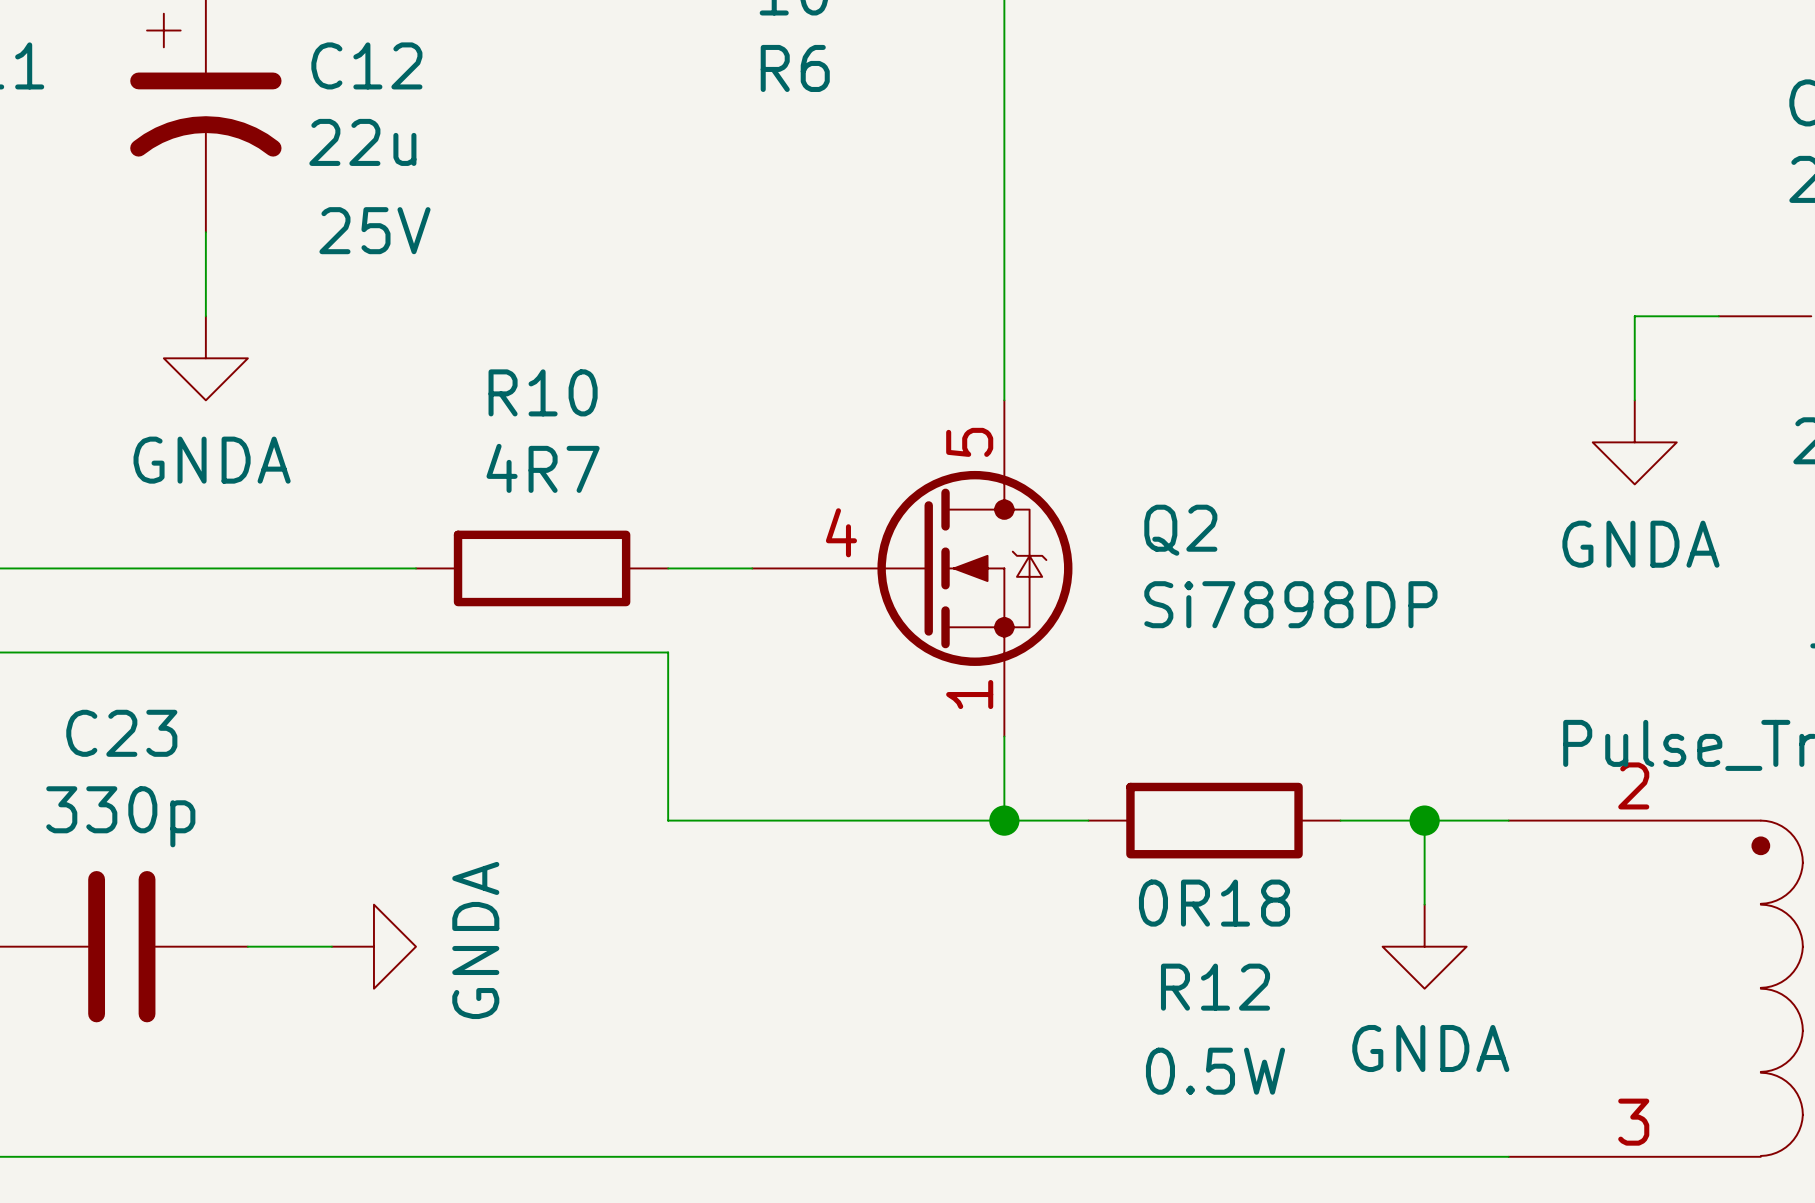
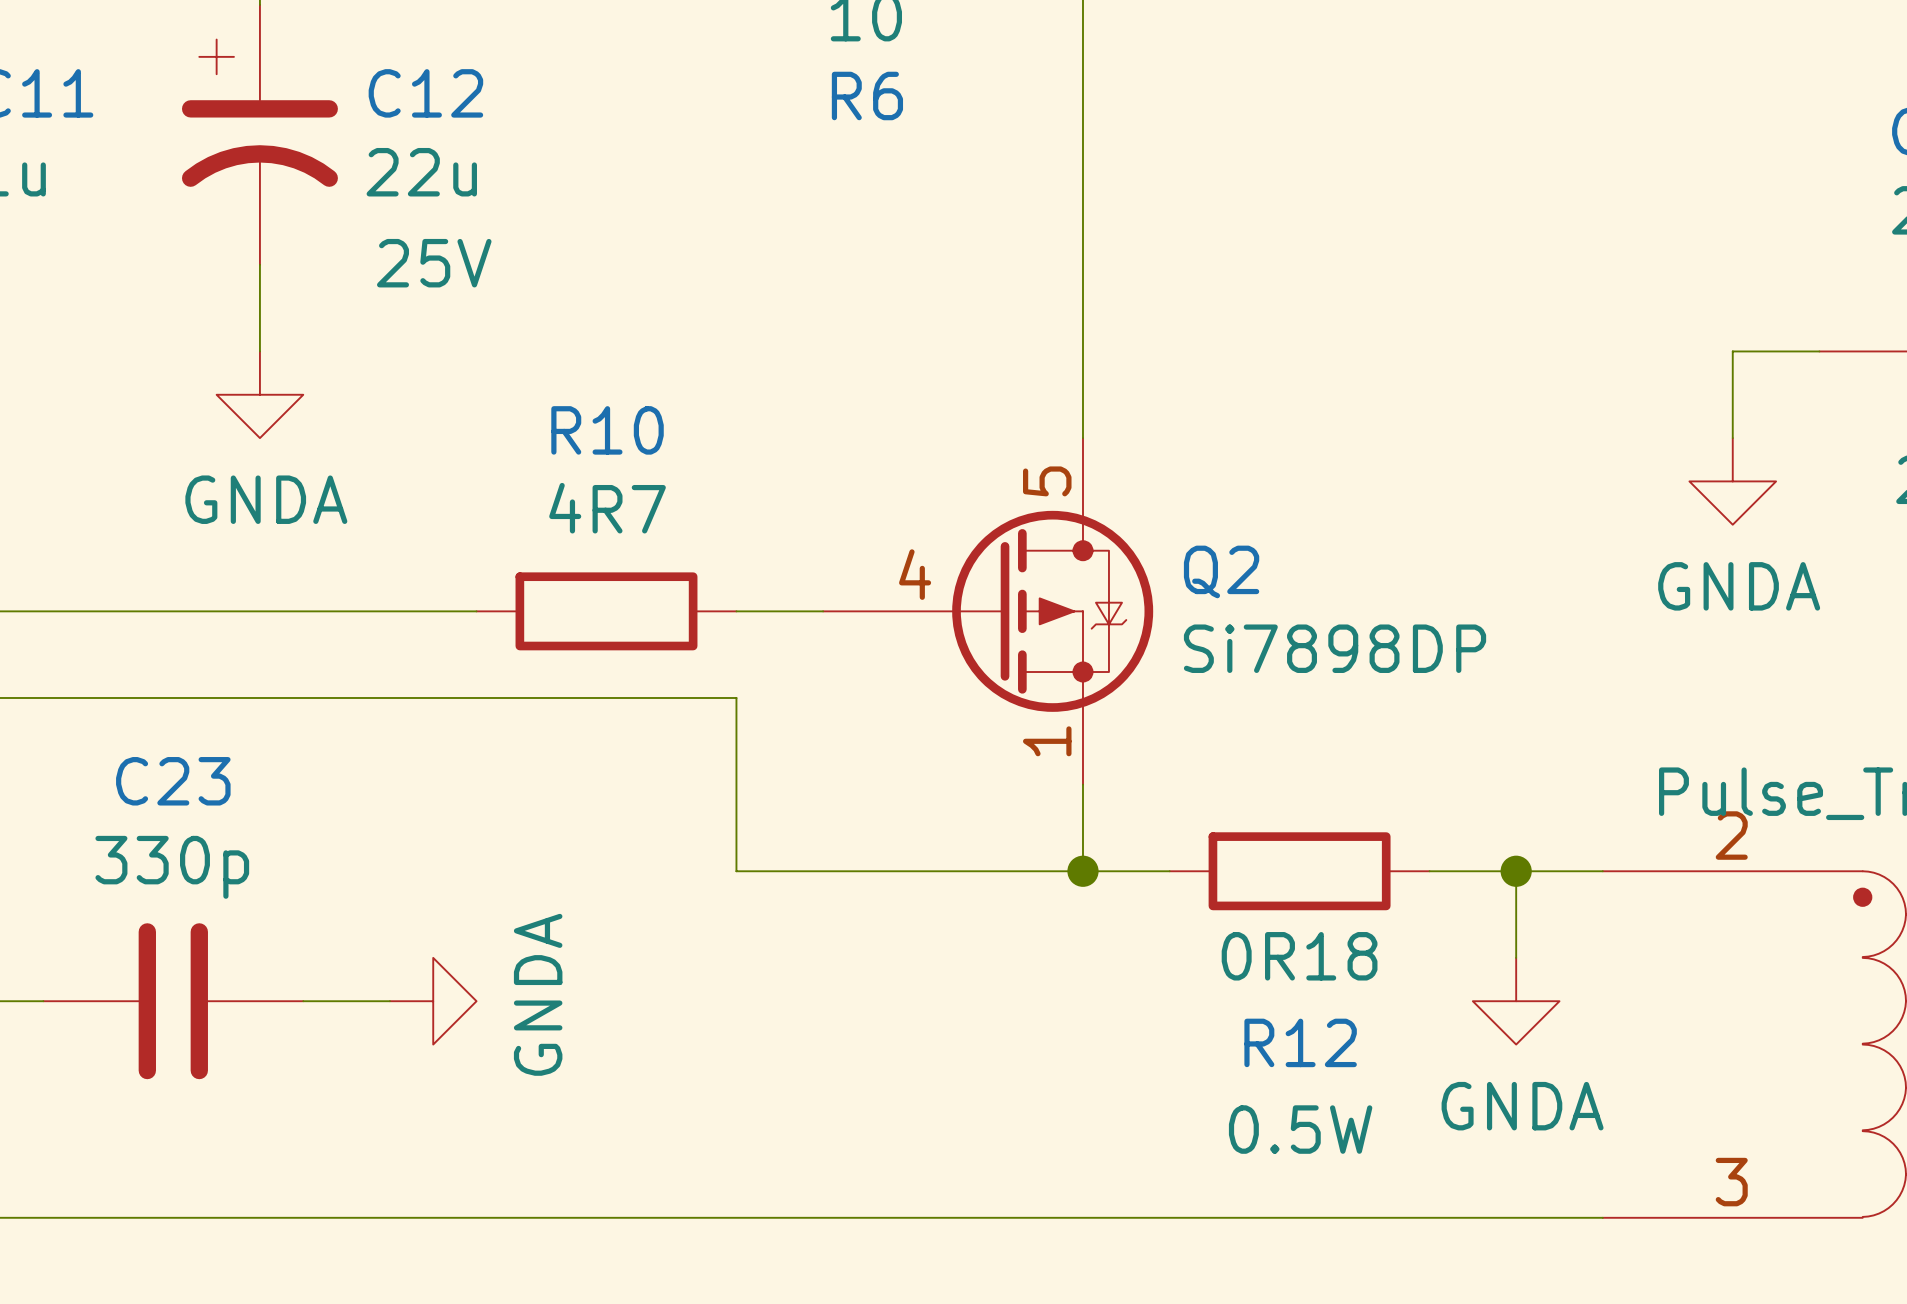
Q2 symbol: [752, 400, 1073, 737] -> [823, 438, 1154, 785]
Q2 name position: Q2 (1180, 530) -> Q2 (1221, 571)
Q2 value position: Si7898DP (1290, 604) -> Si7898DP (1335, 648)

